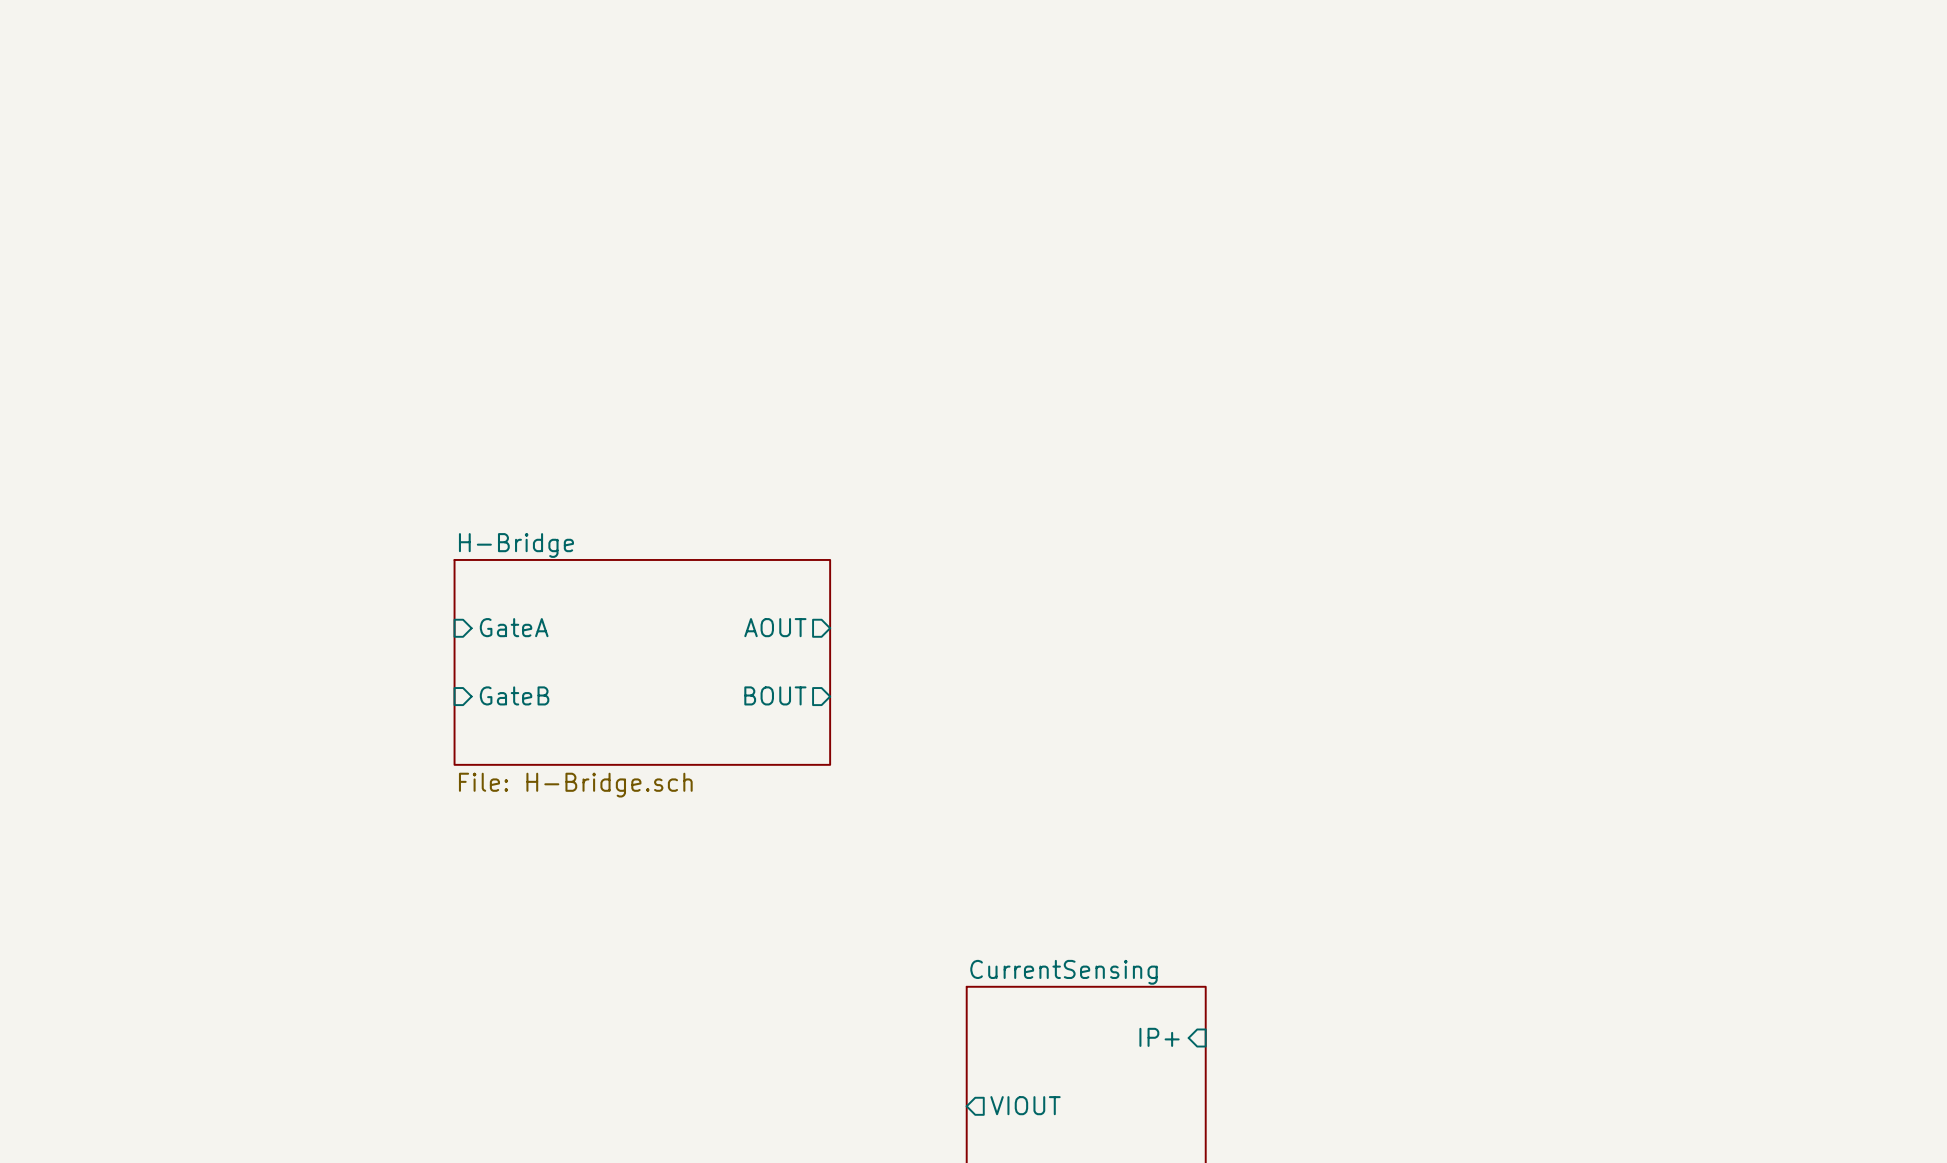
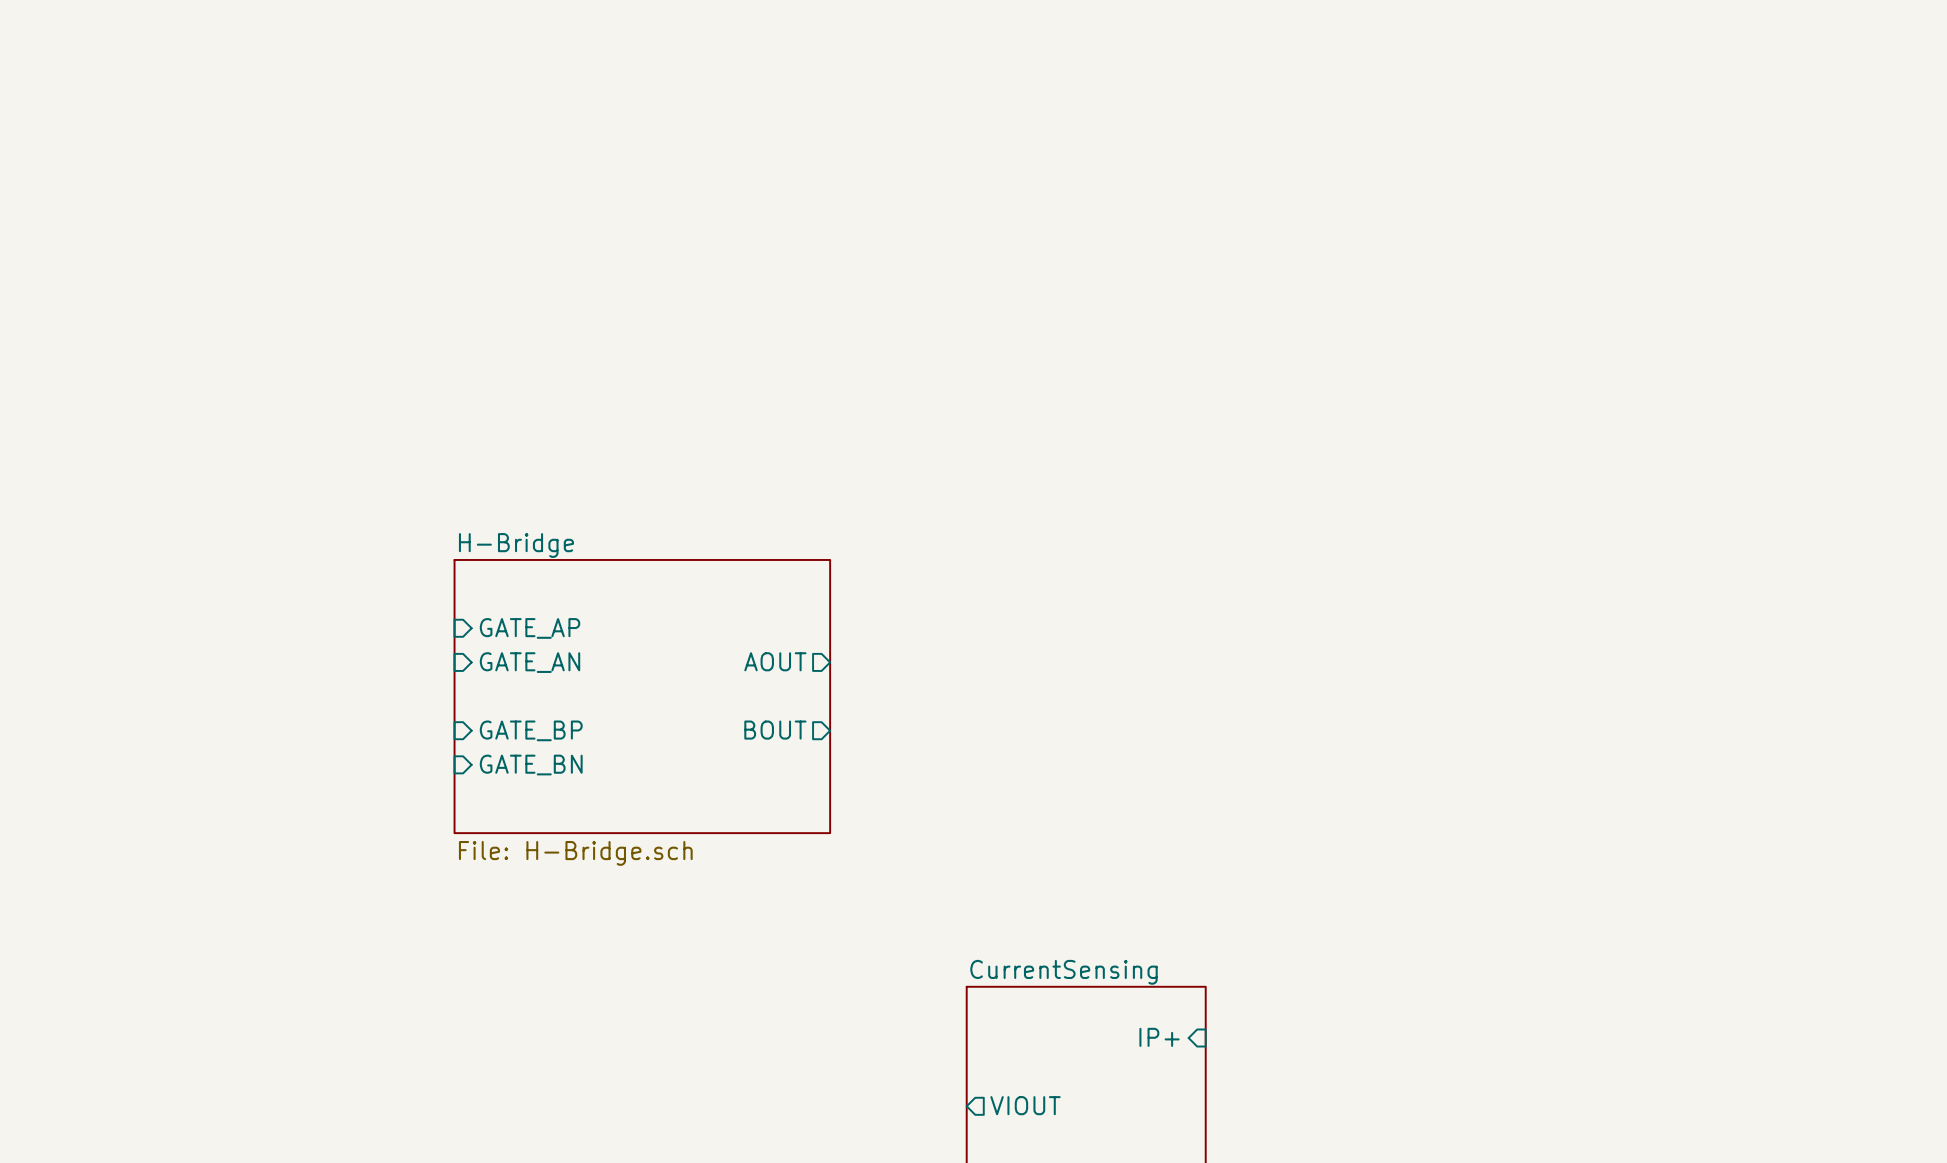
sheet pin: GateA (514, 627) -> GATE_AP (530, 628)
sheet pin position: AOUT (775, 627) -> AOUT (775, 661)
sheet pin: none -> GATE_AN (530, 662)
sheet H-Bridge: File: H-Bridge.sch (642, 662) -> none
sheet pin: GateB (514, 695) -> none
sheet pin position: BOUT (775, 695) -> BOUT (775, 730)
sheet H-Bridge: none -> File: H-Bridge.sch (642, 696)
sheet pin: none -> GATE_BP (531, 730)
sheet pin: none -> GATE_BN (531, 765)

